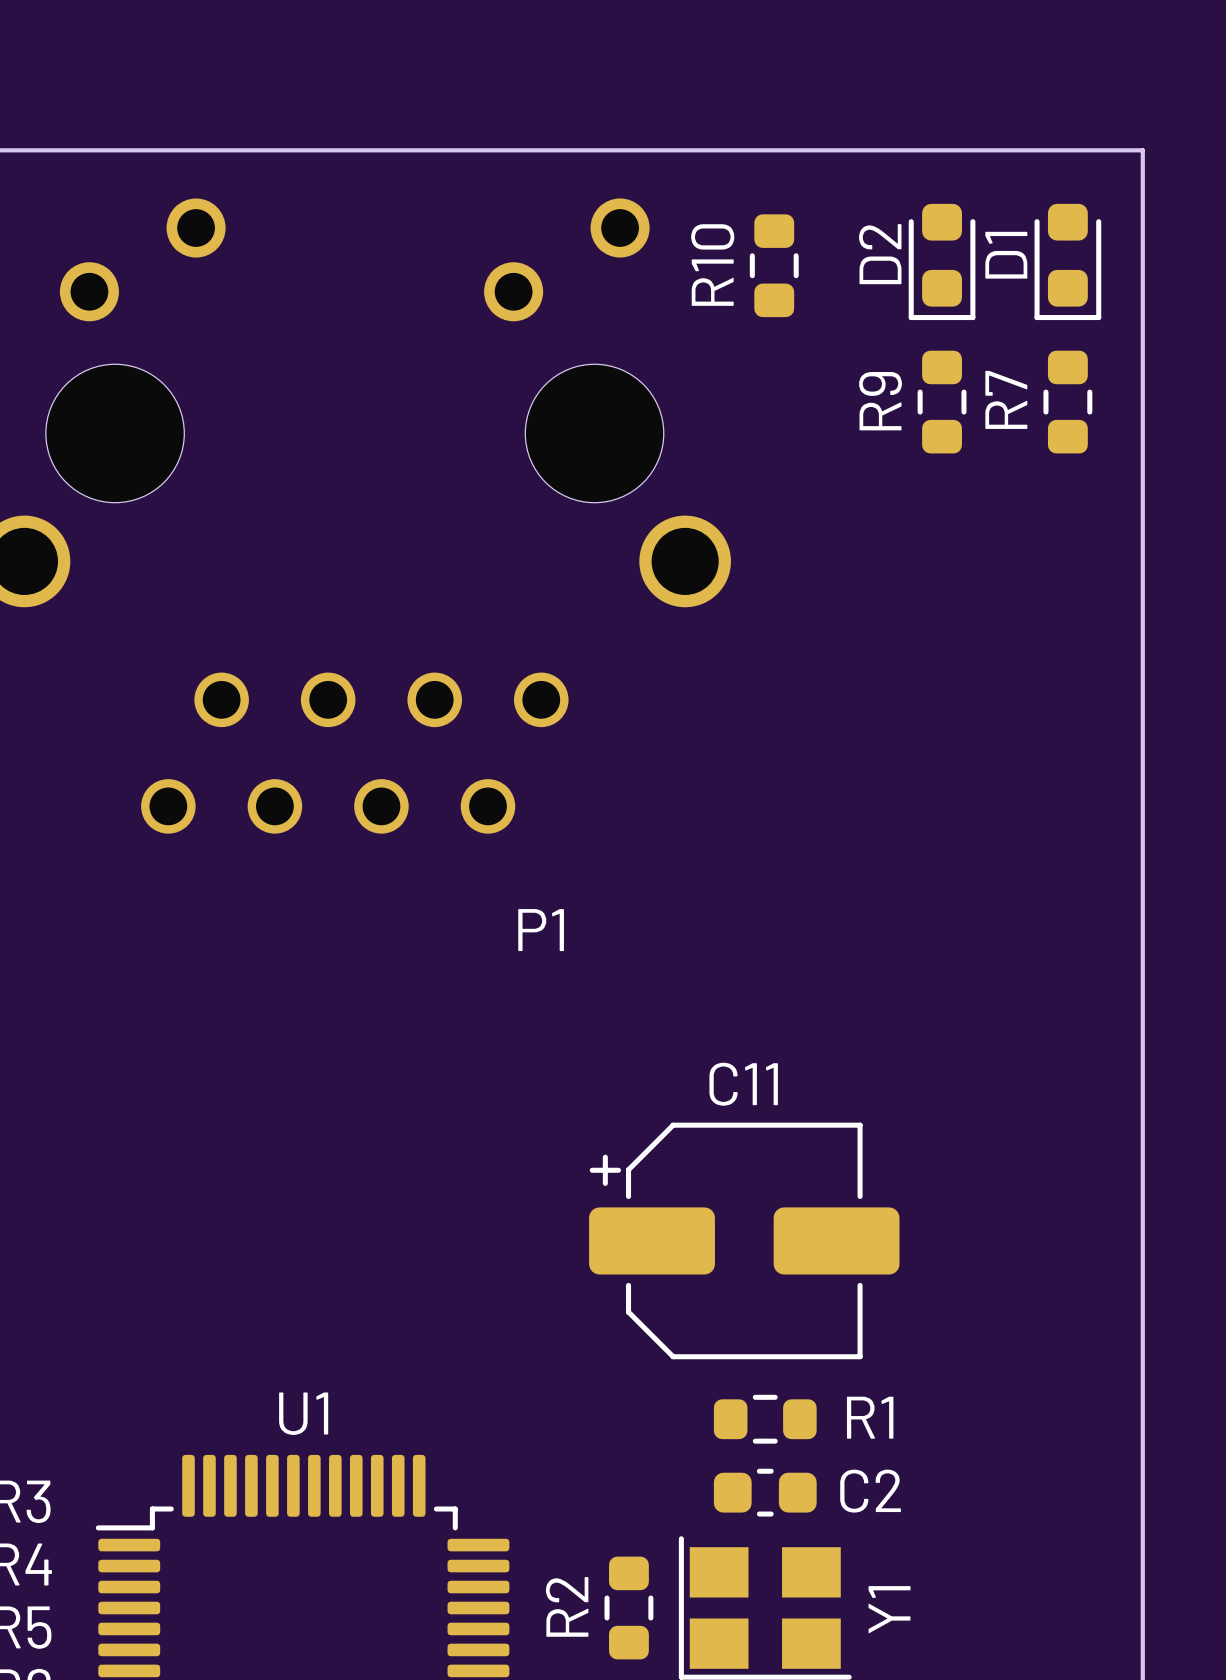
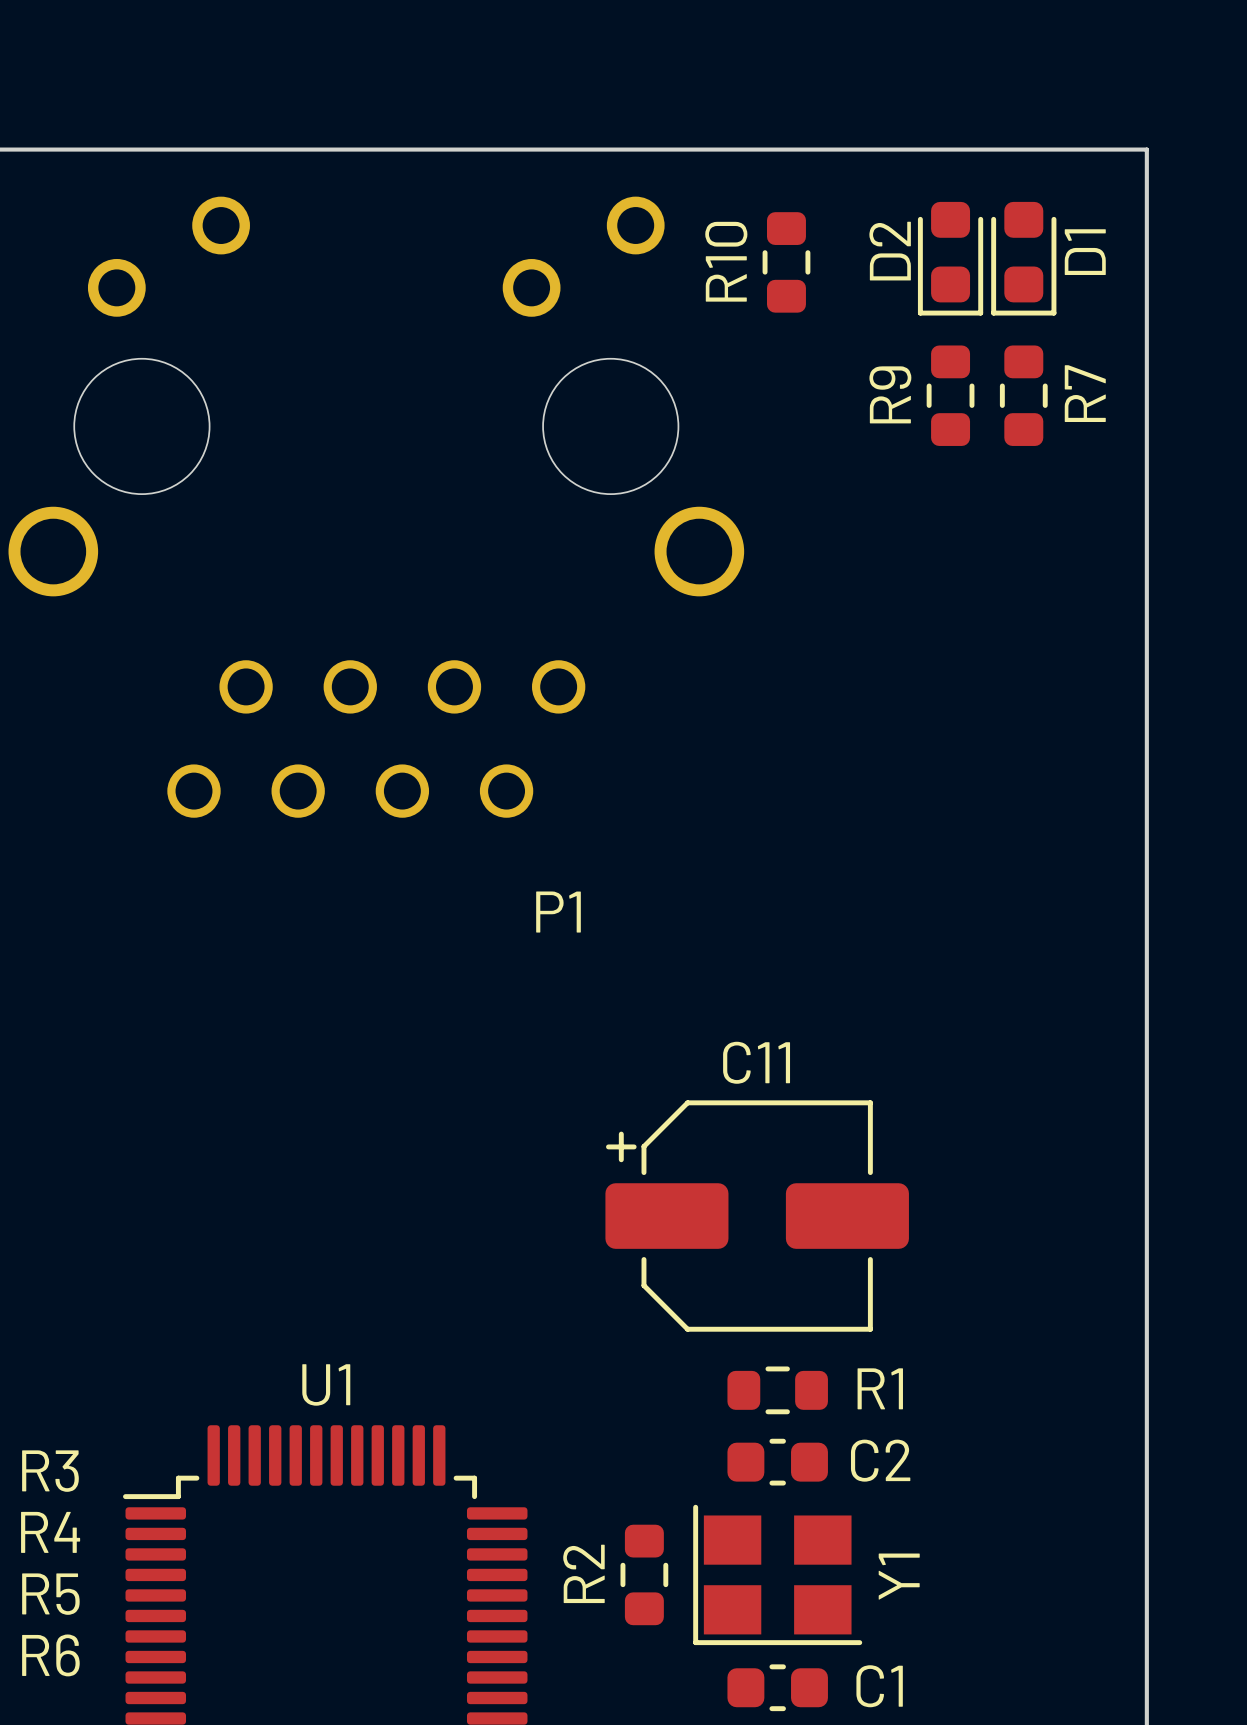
D1 name position: D1 (1006, 255) -> D1 (1085, 252)
D1 position: (1067, 261) -> (1023, 258)
R7 name position: R7 (1006, 399) -> R7 (1085, 393)
R7 position: (1067, 402) -> (1023, 395)

